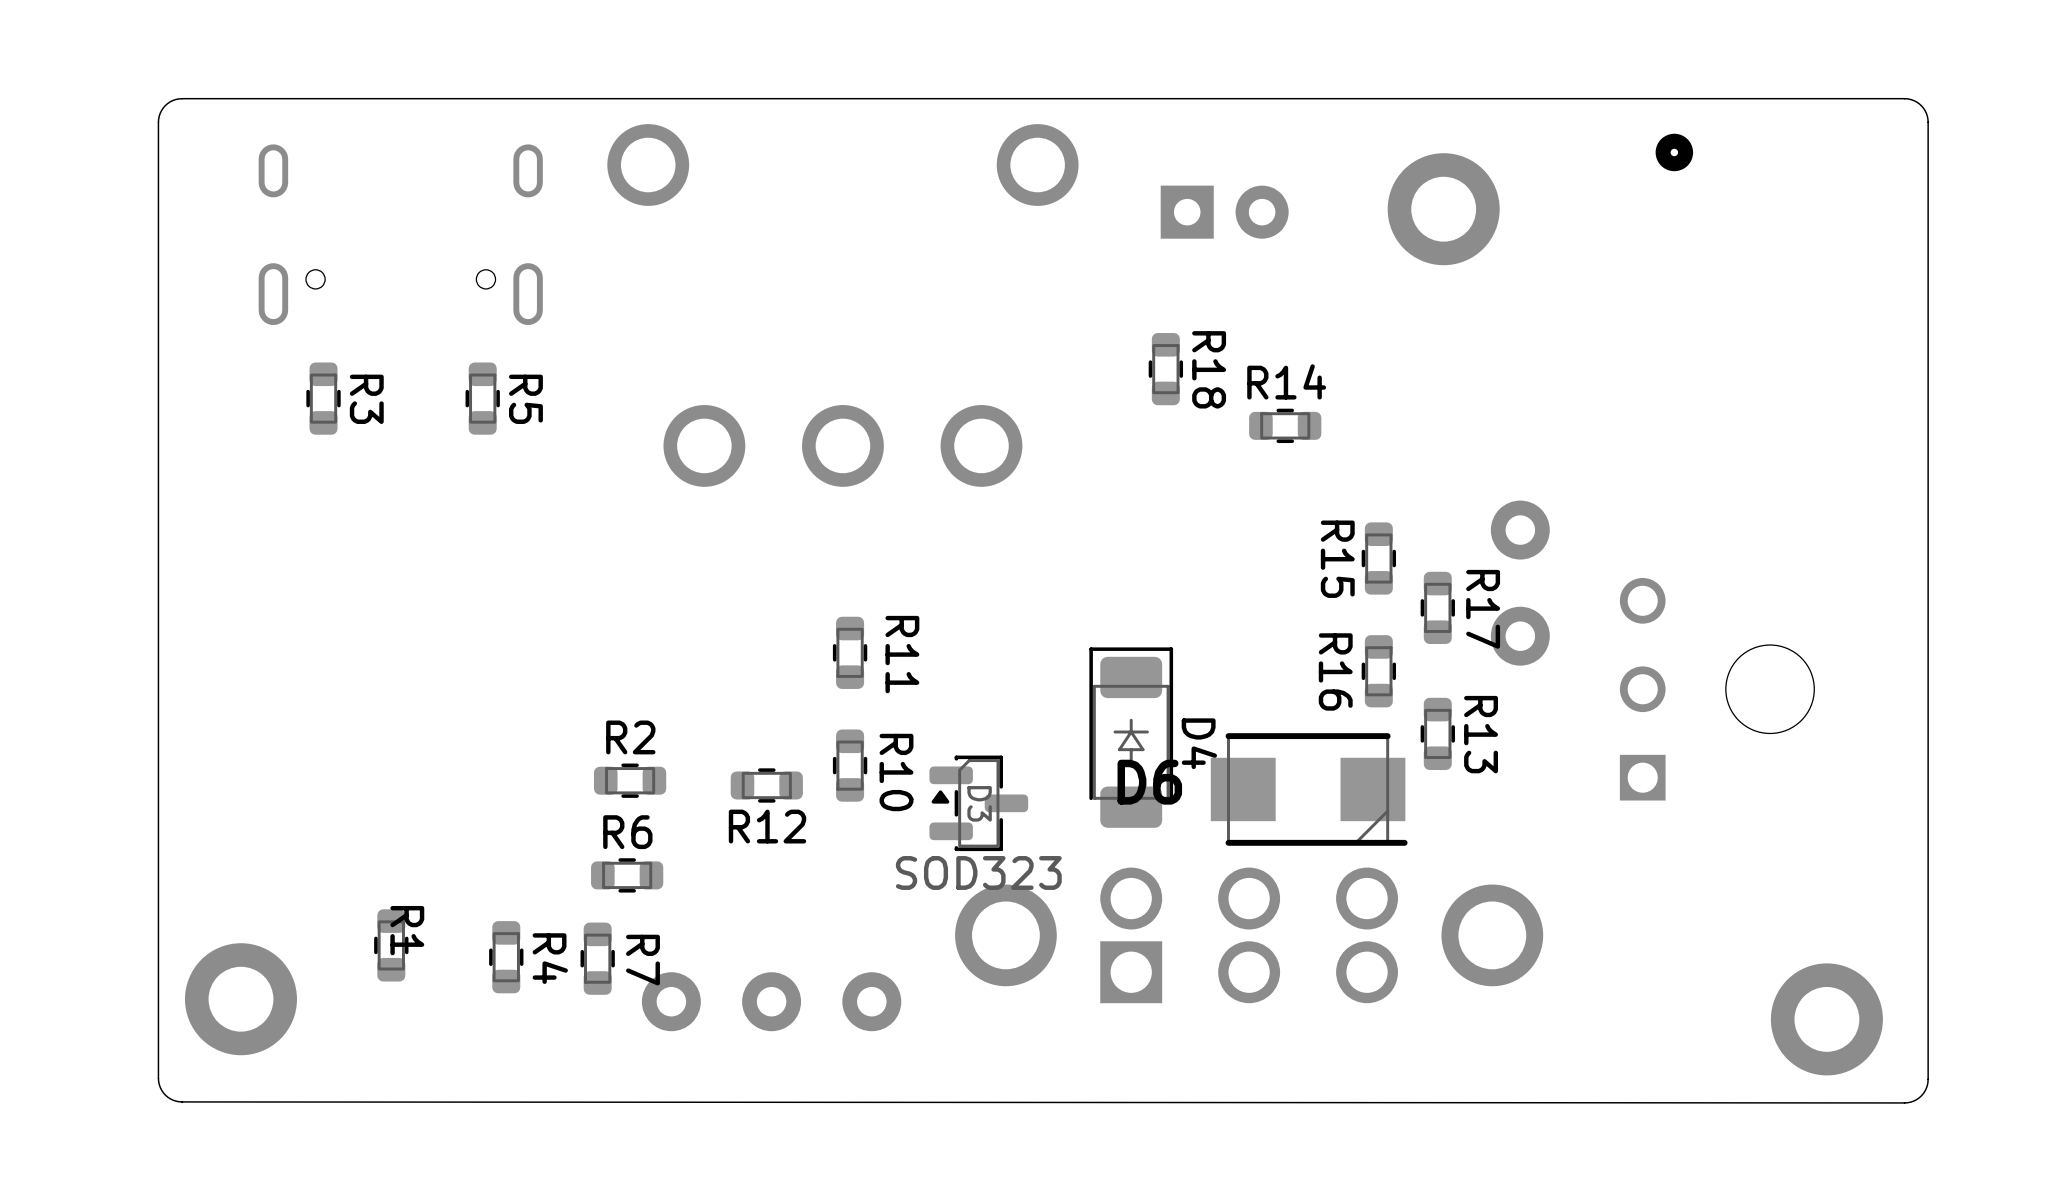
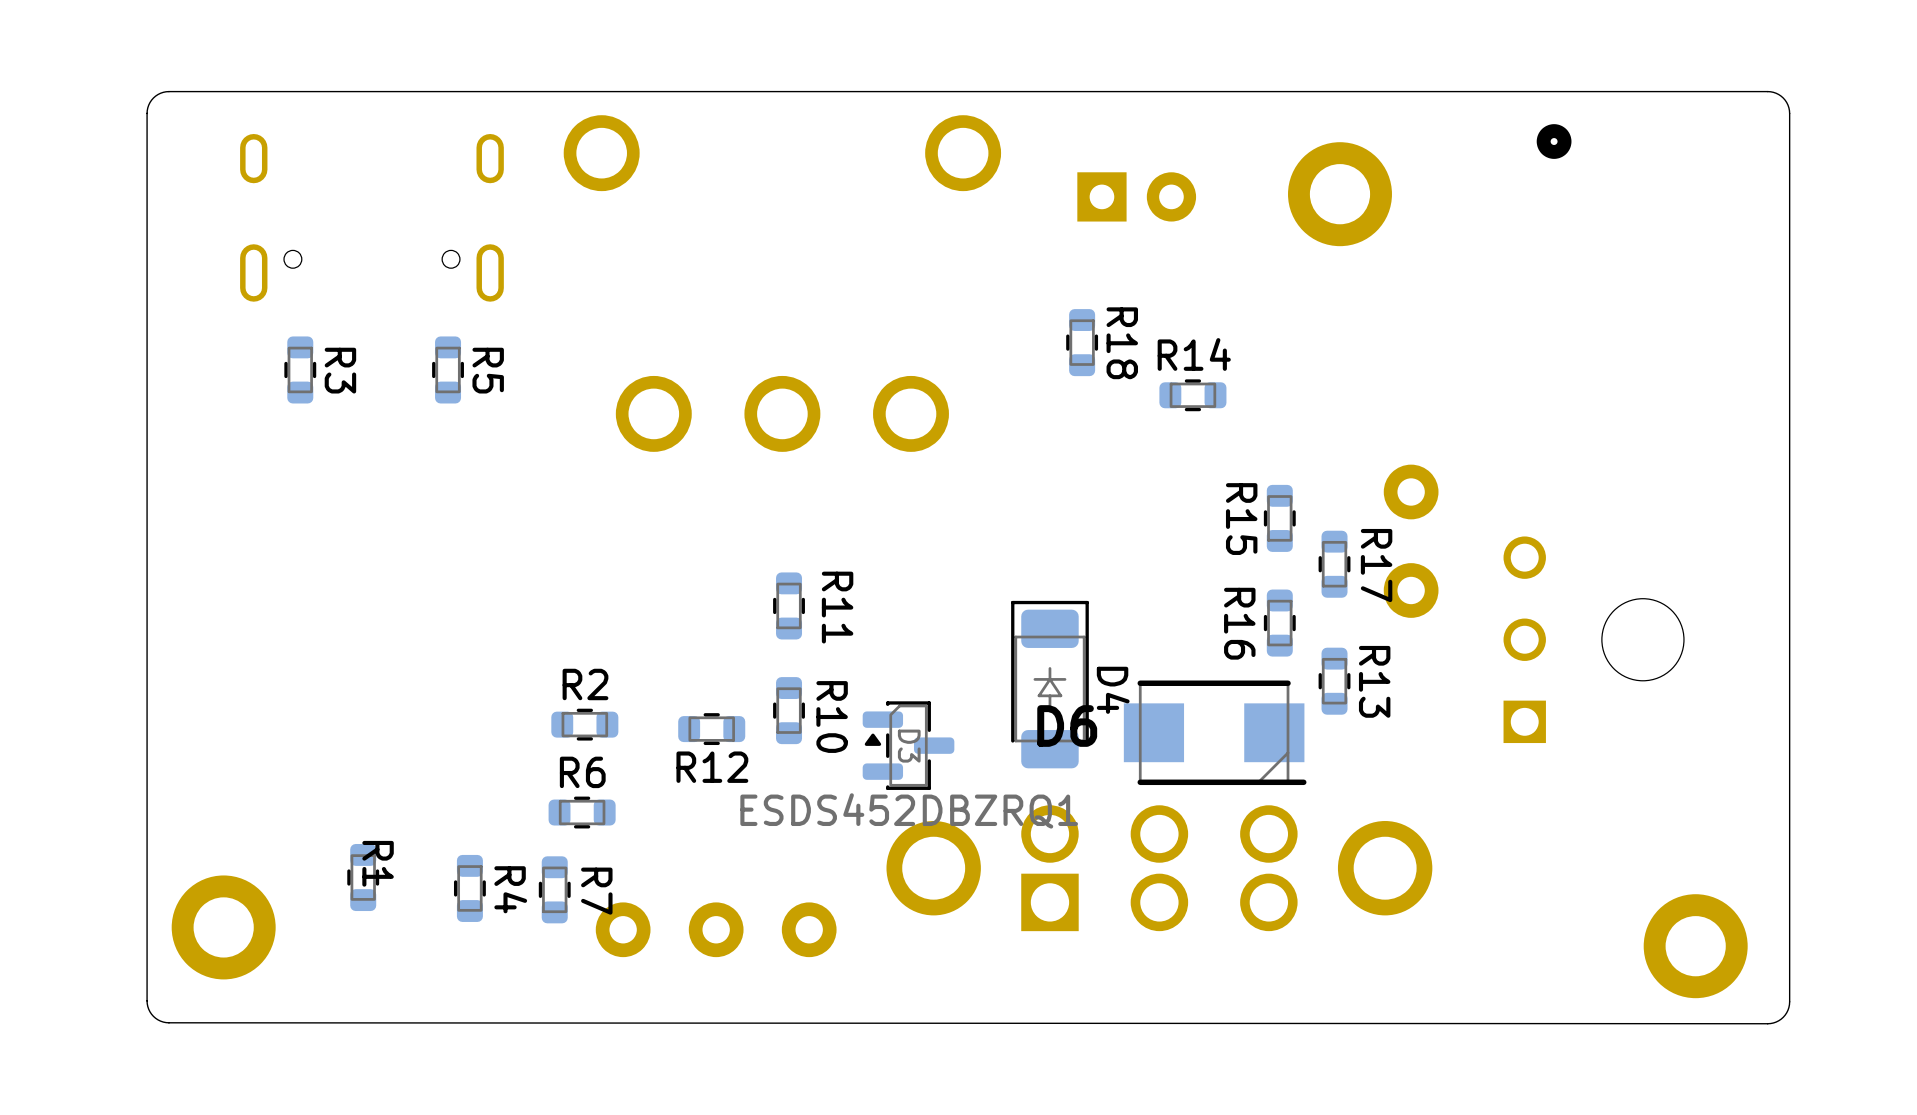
D3 value: SOD323 (978, 872) -> ESDS452DBZRQ1 (909, 810)

